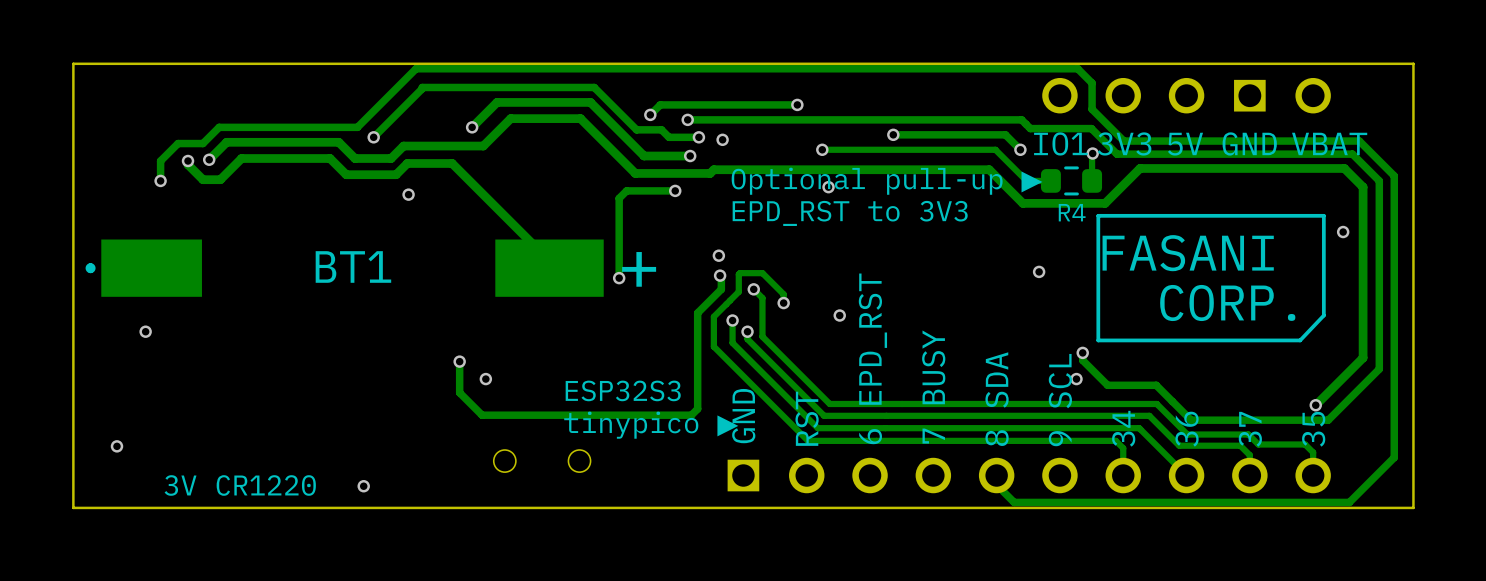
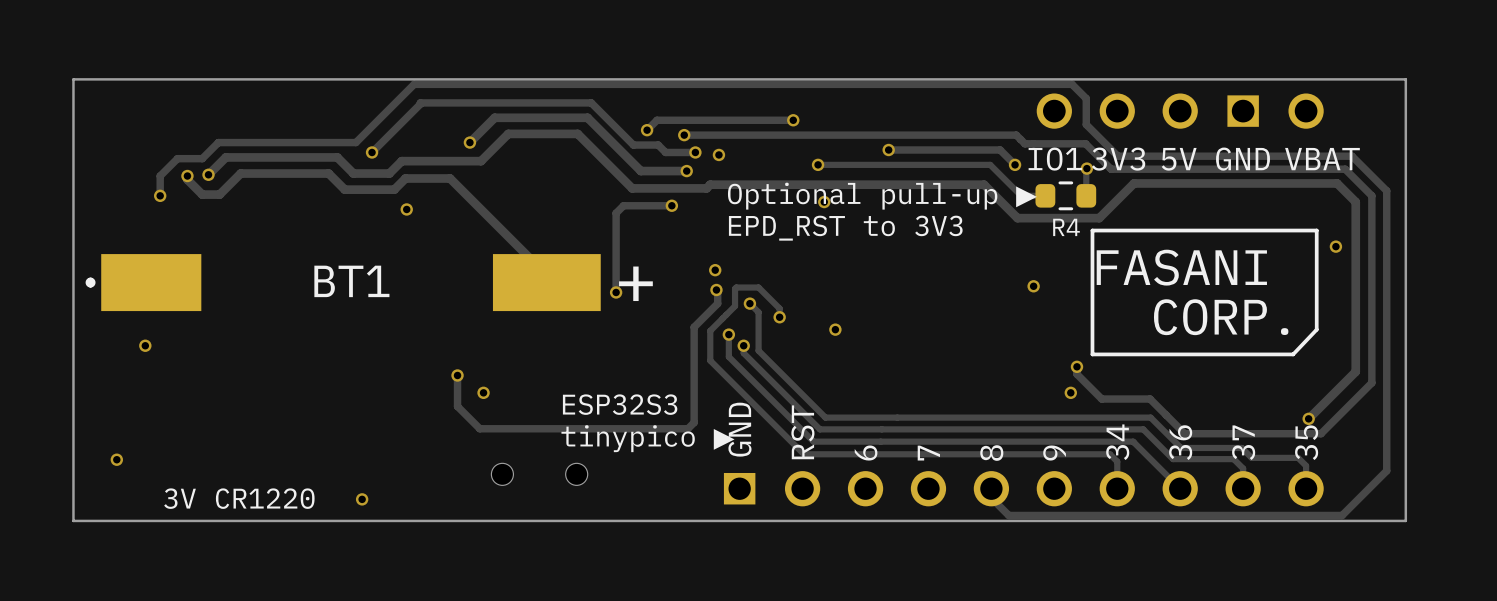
text: 6 EPD_RST (872, 358) -> none
text: 7 BUSY (933, 387) -> none
text: 8 SDA (997, 399) -> none
text: 9 SCL (1060, 400) -> none
text: none -> 6 (866, 453)
text: none -> 7 (928, 453)
text: none -> 8 (991, 453)
text: none -> 9 (1054, 453)

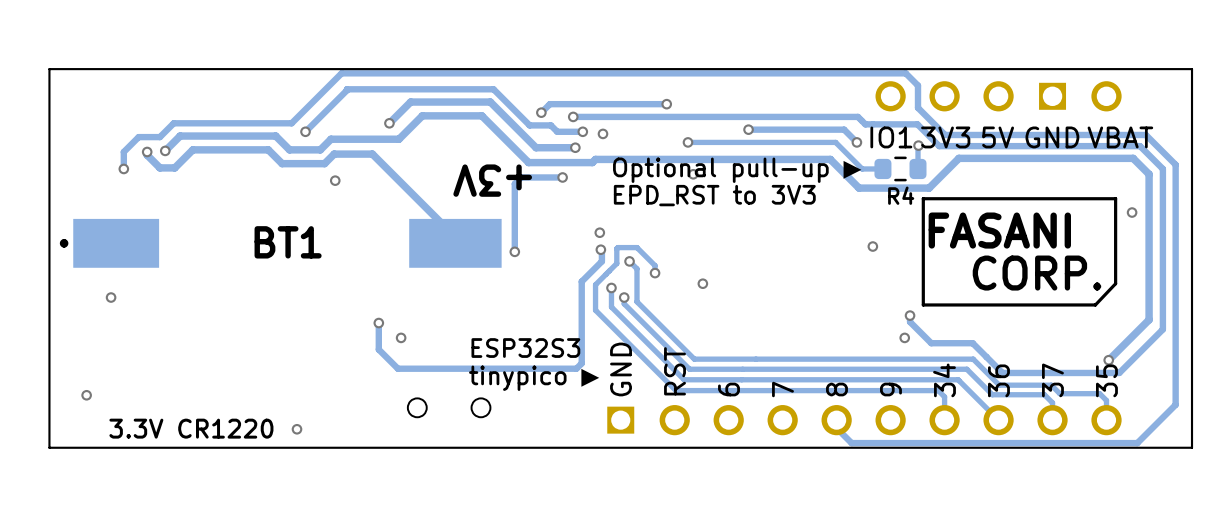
text: none -> +3V (492, 180)
text: + (635, 283) -> none
text: 3V CR1220 (239, 498) -> 3.3V CR1220 (191, 428)

